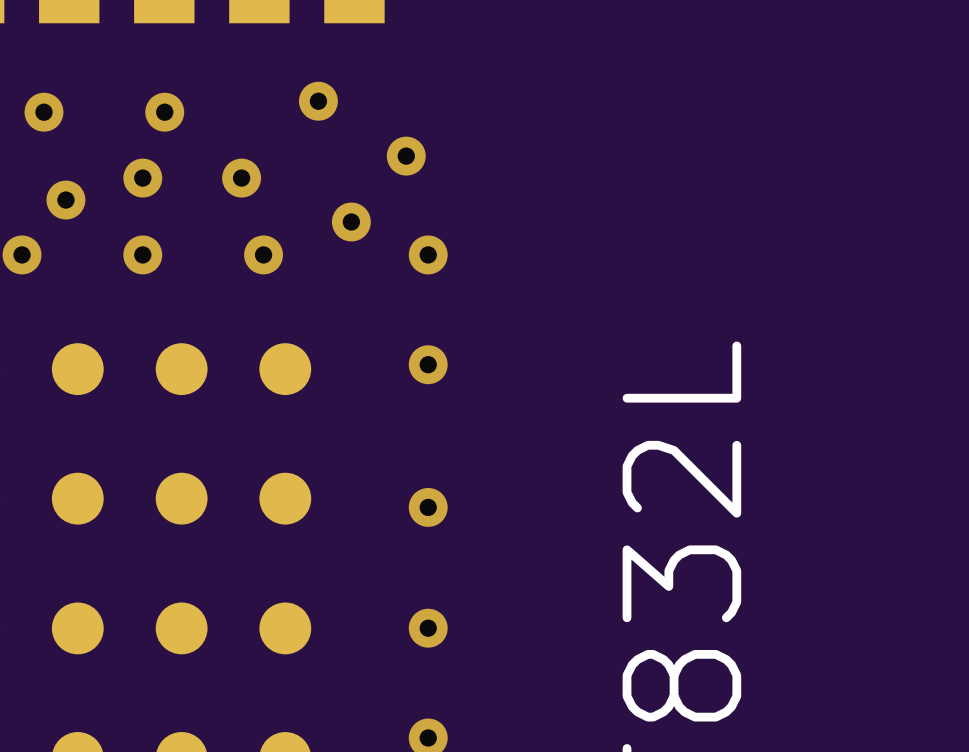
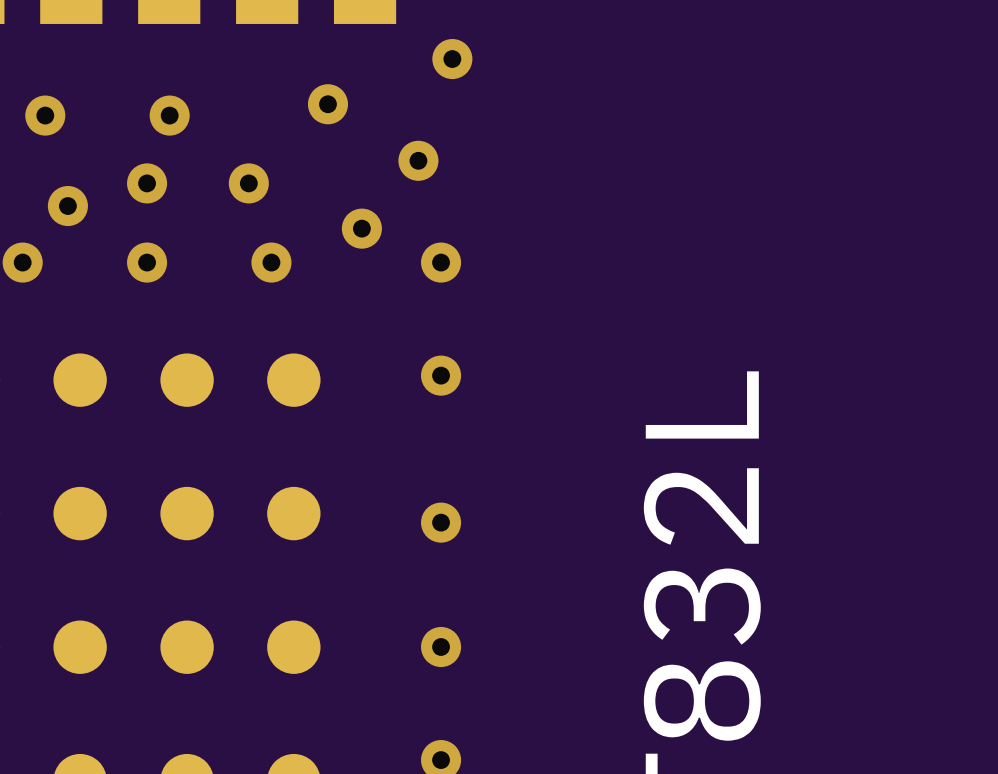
via: none -> (452, 59)

